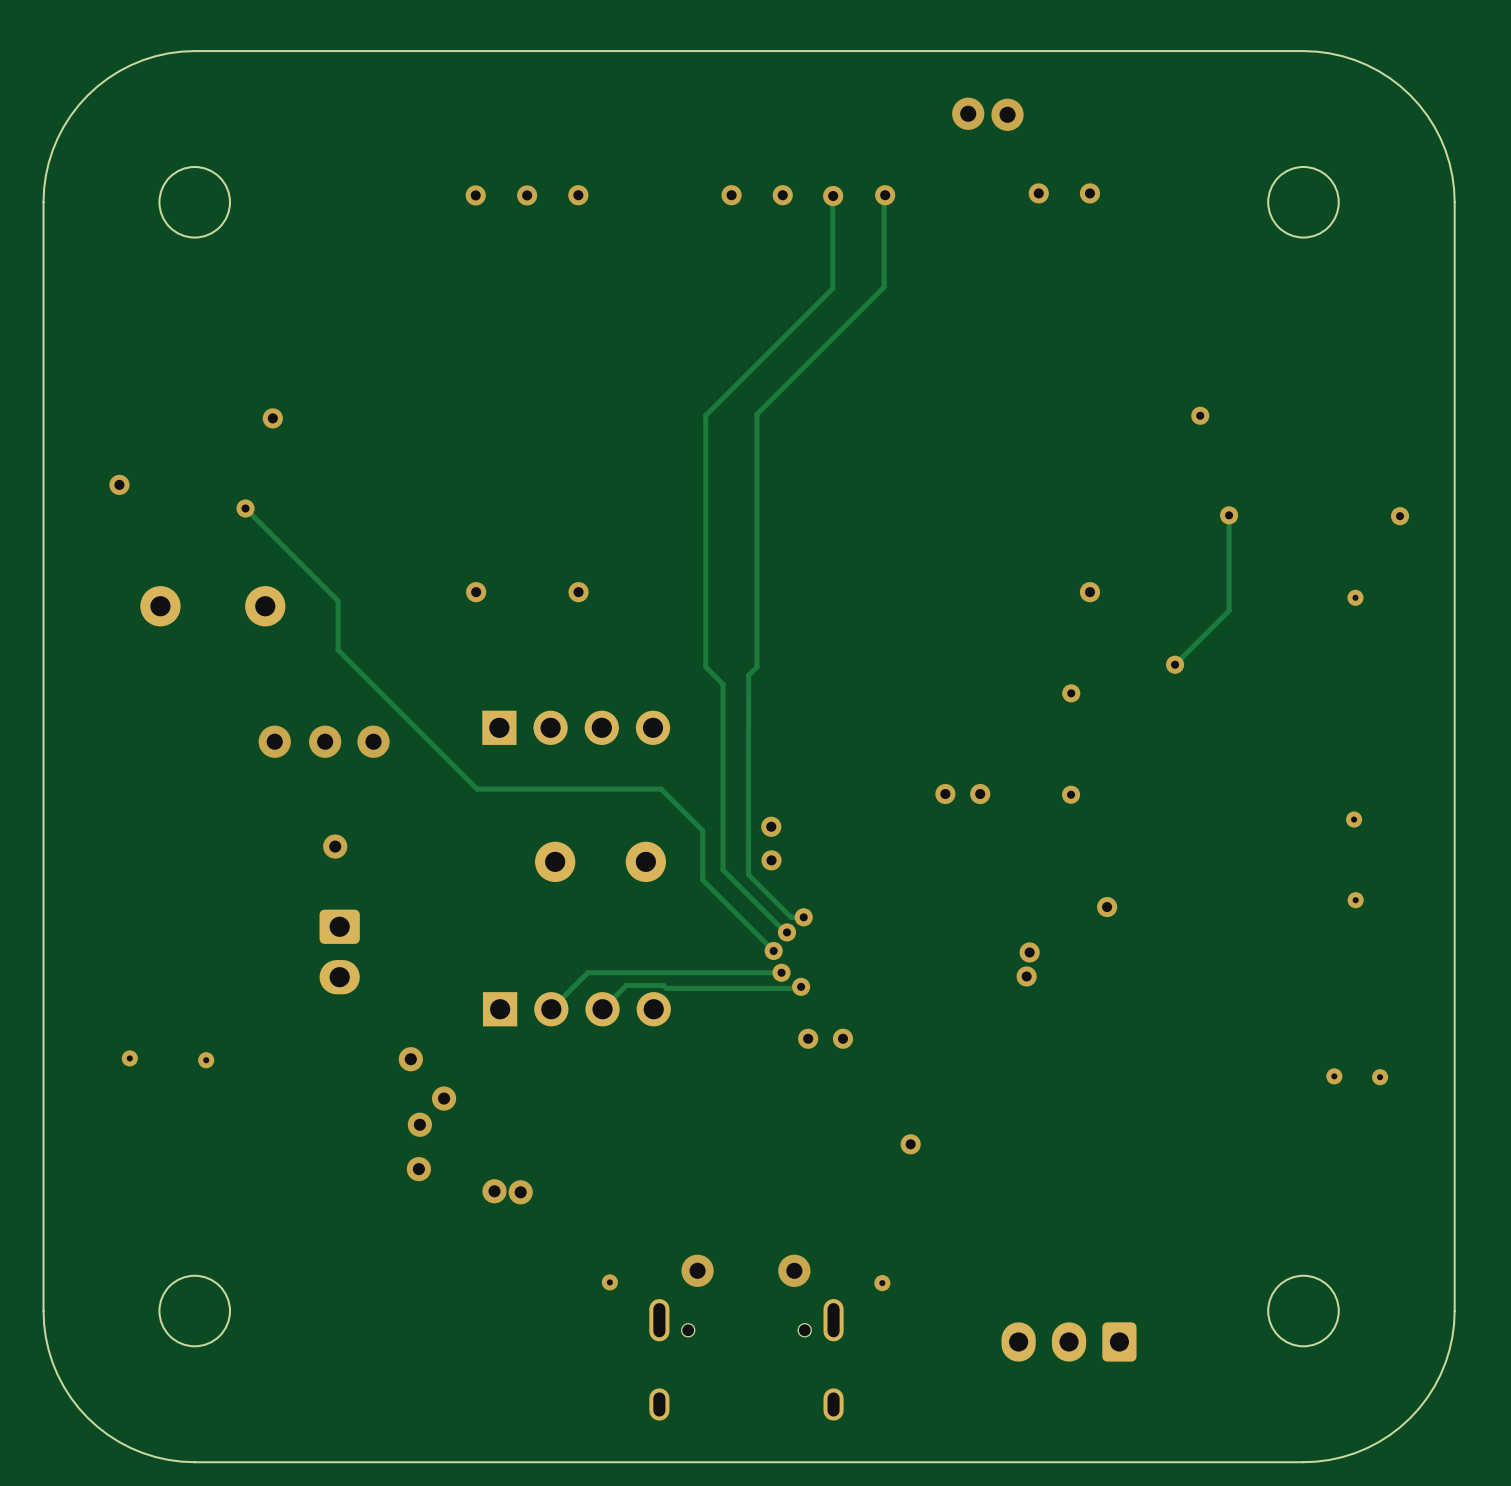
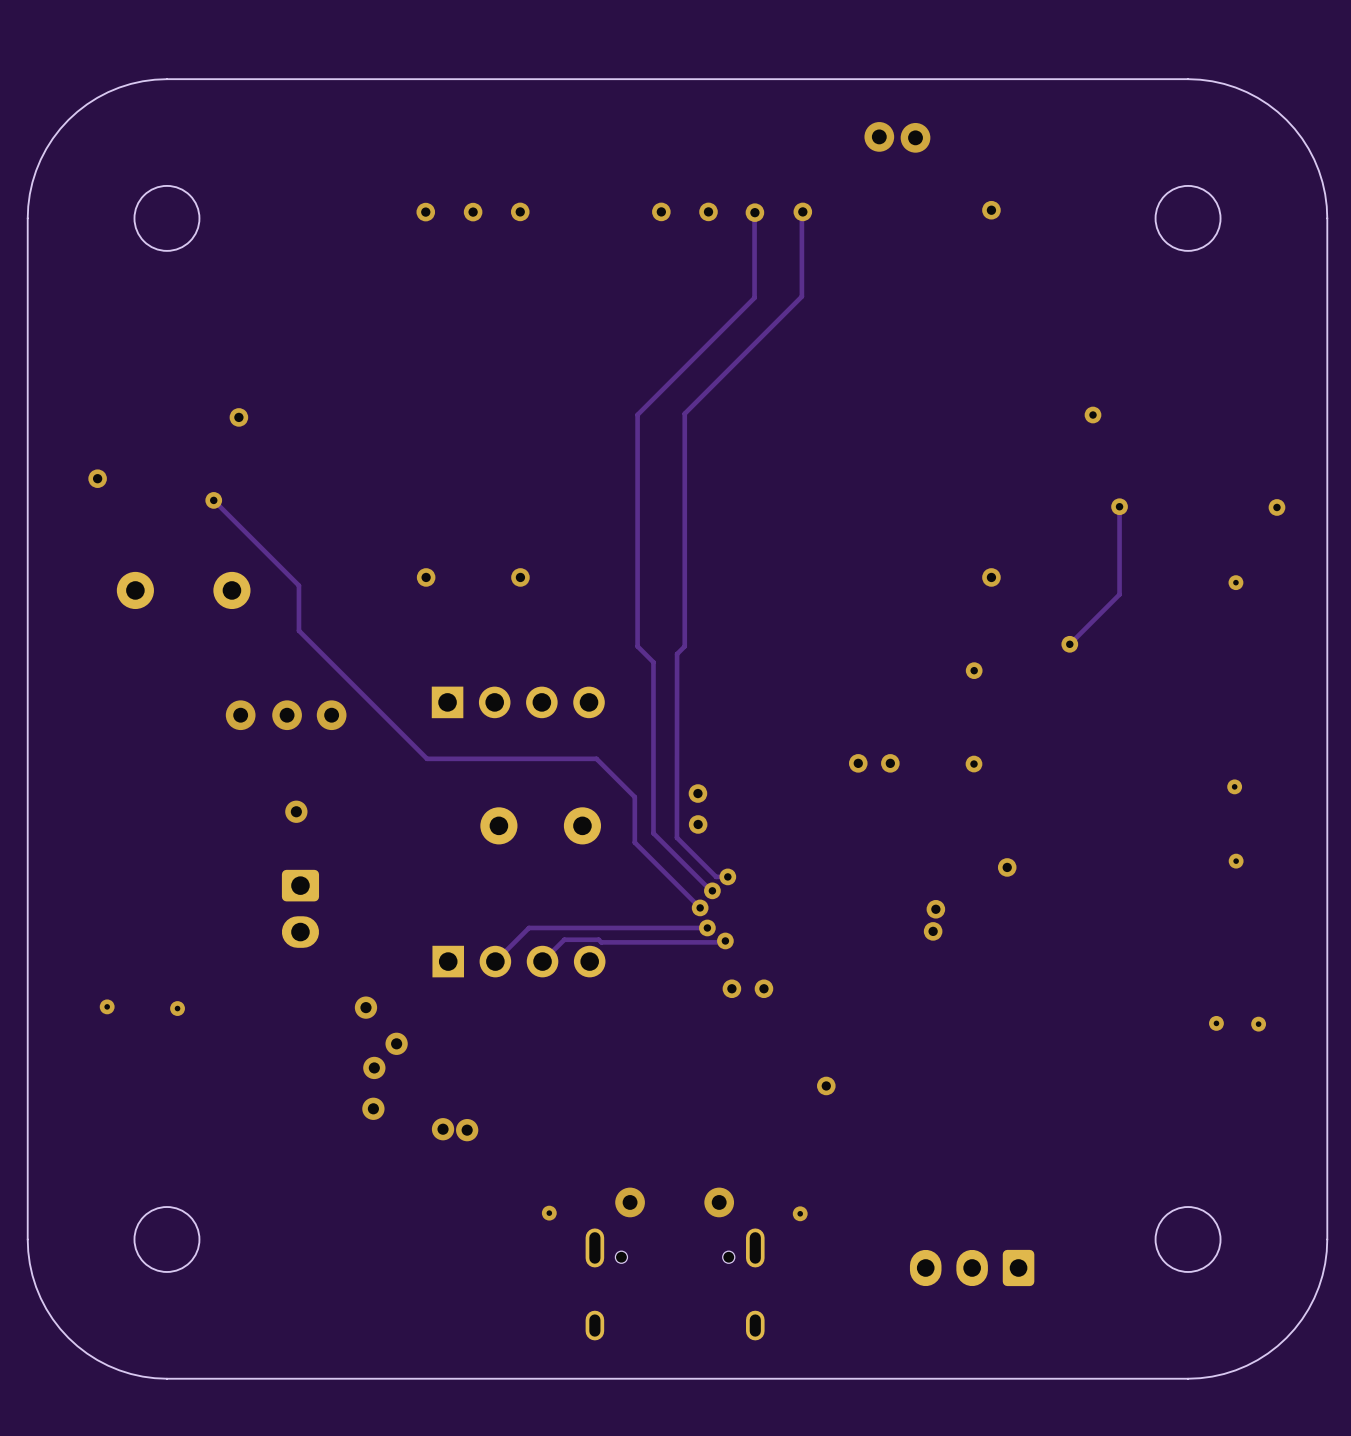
via: (1038, 193) -> none

